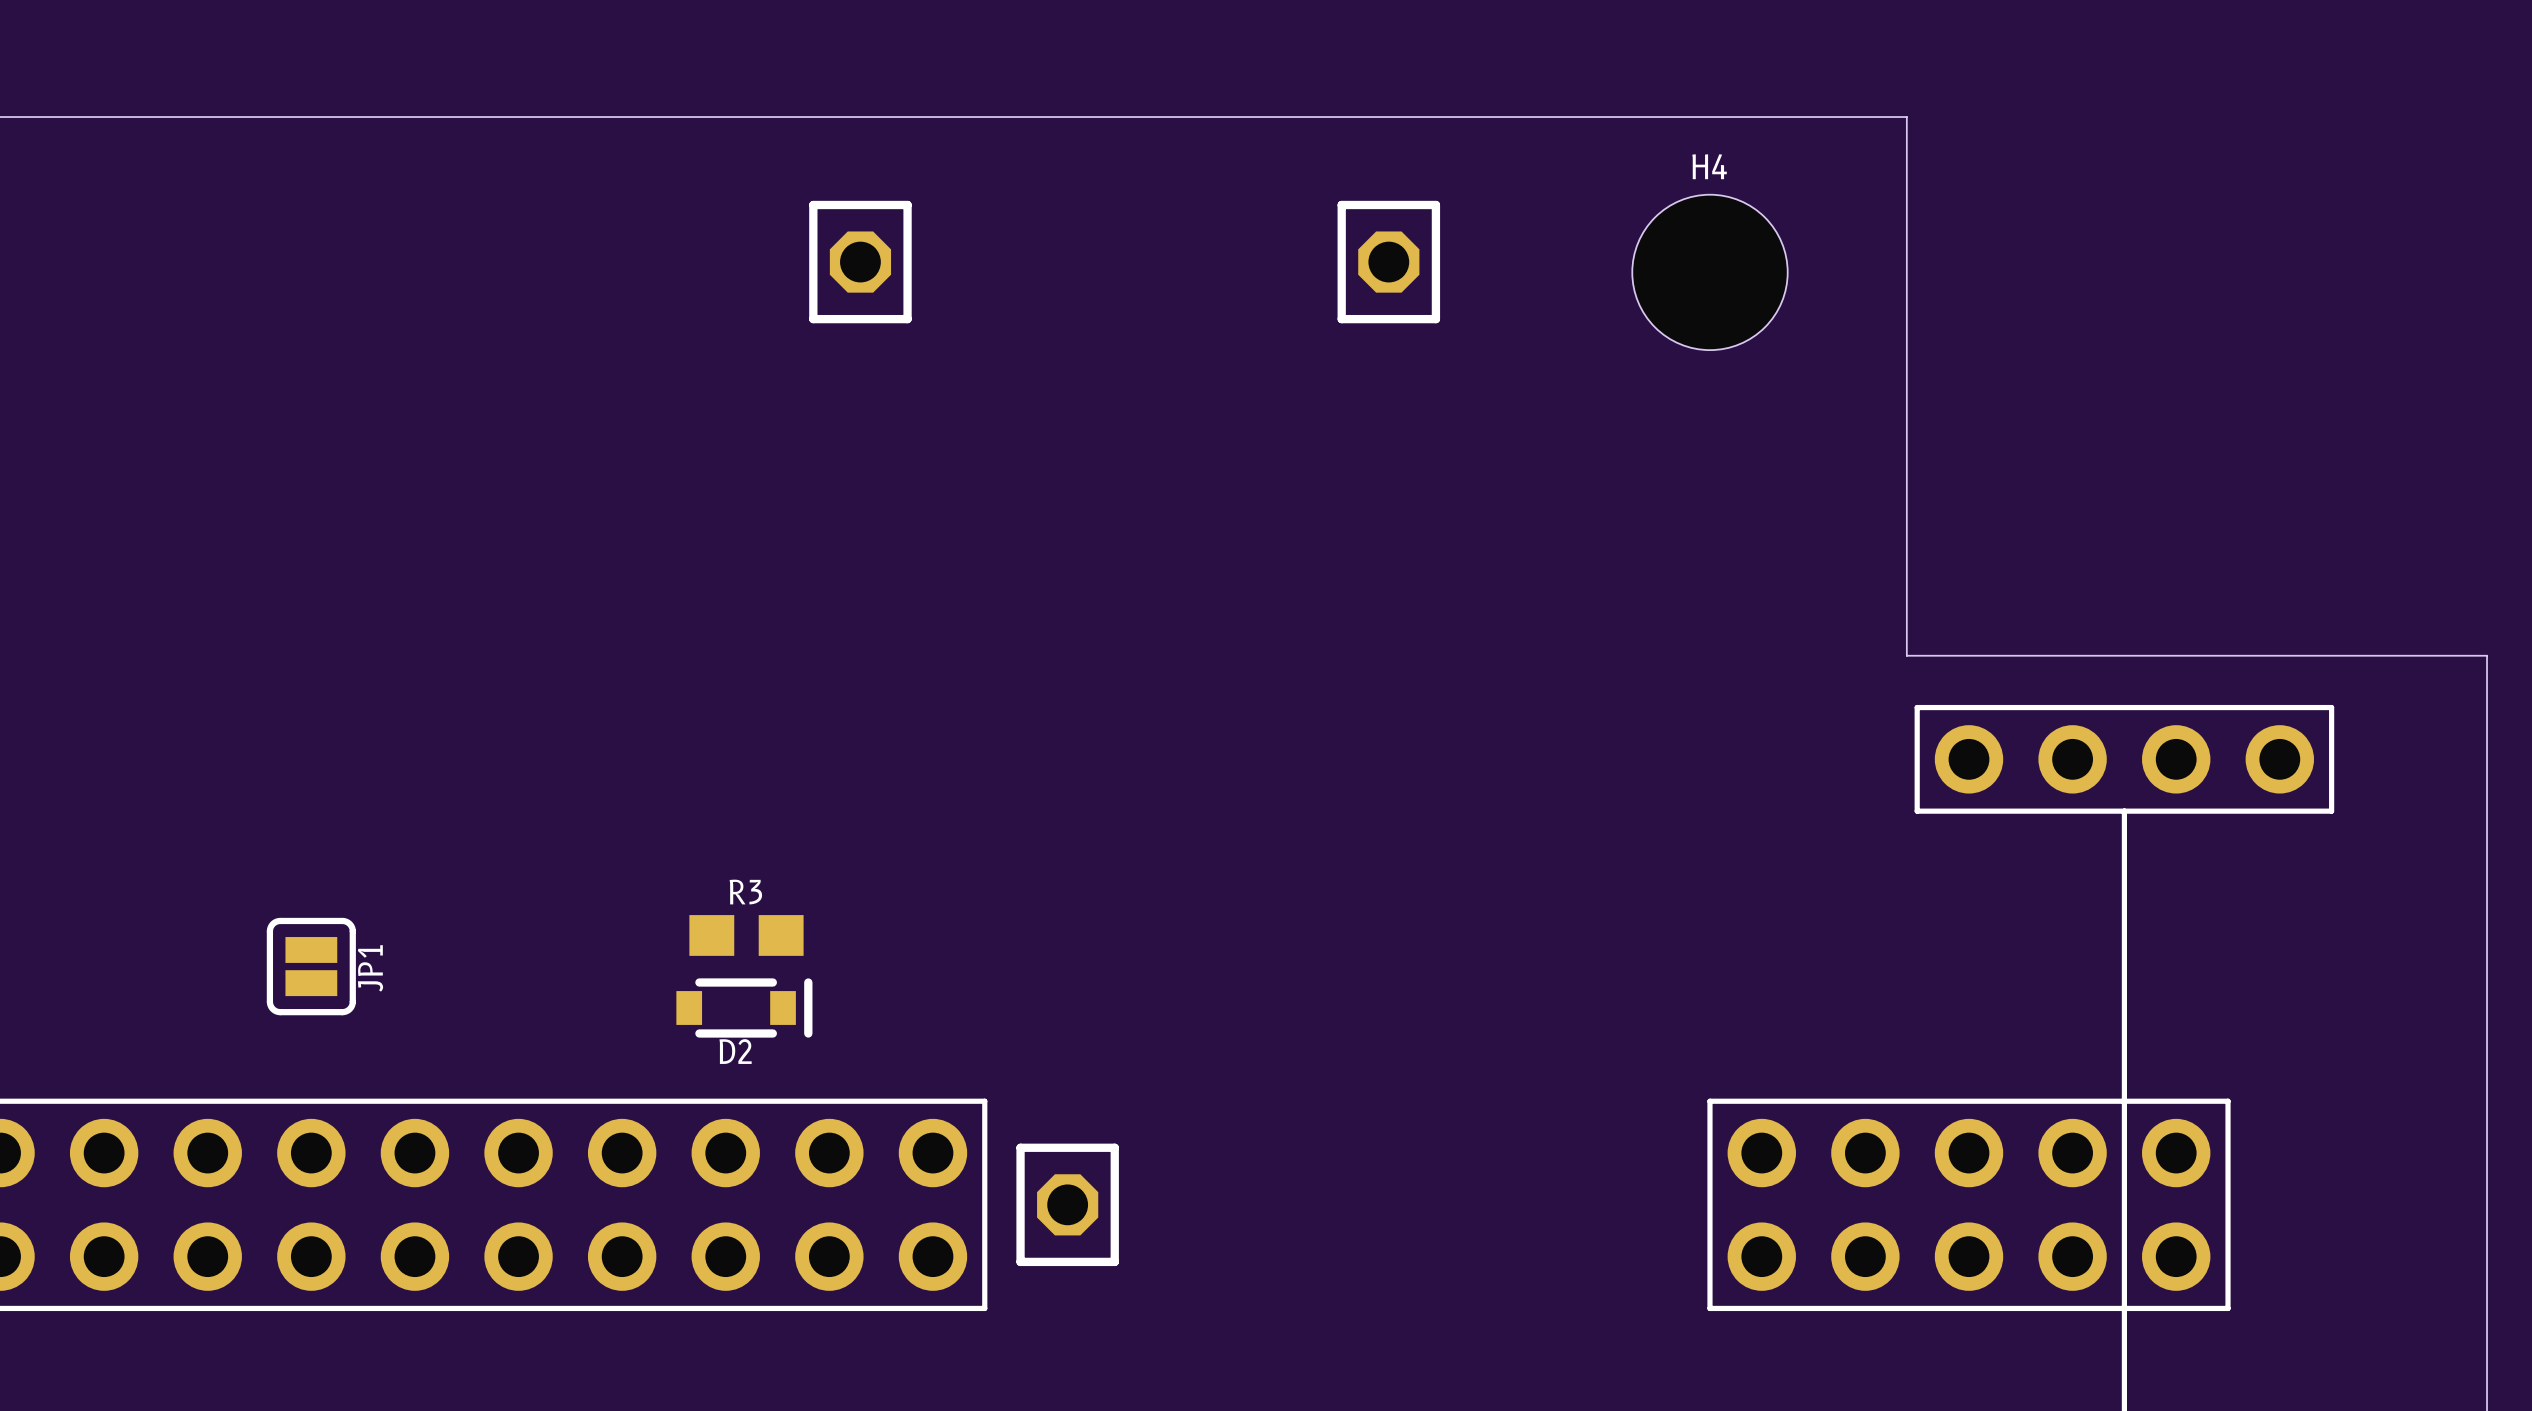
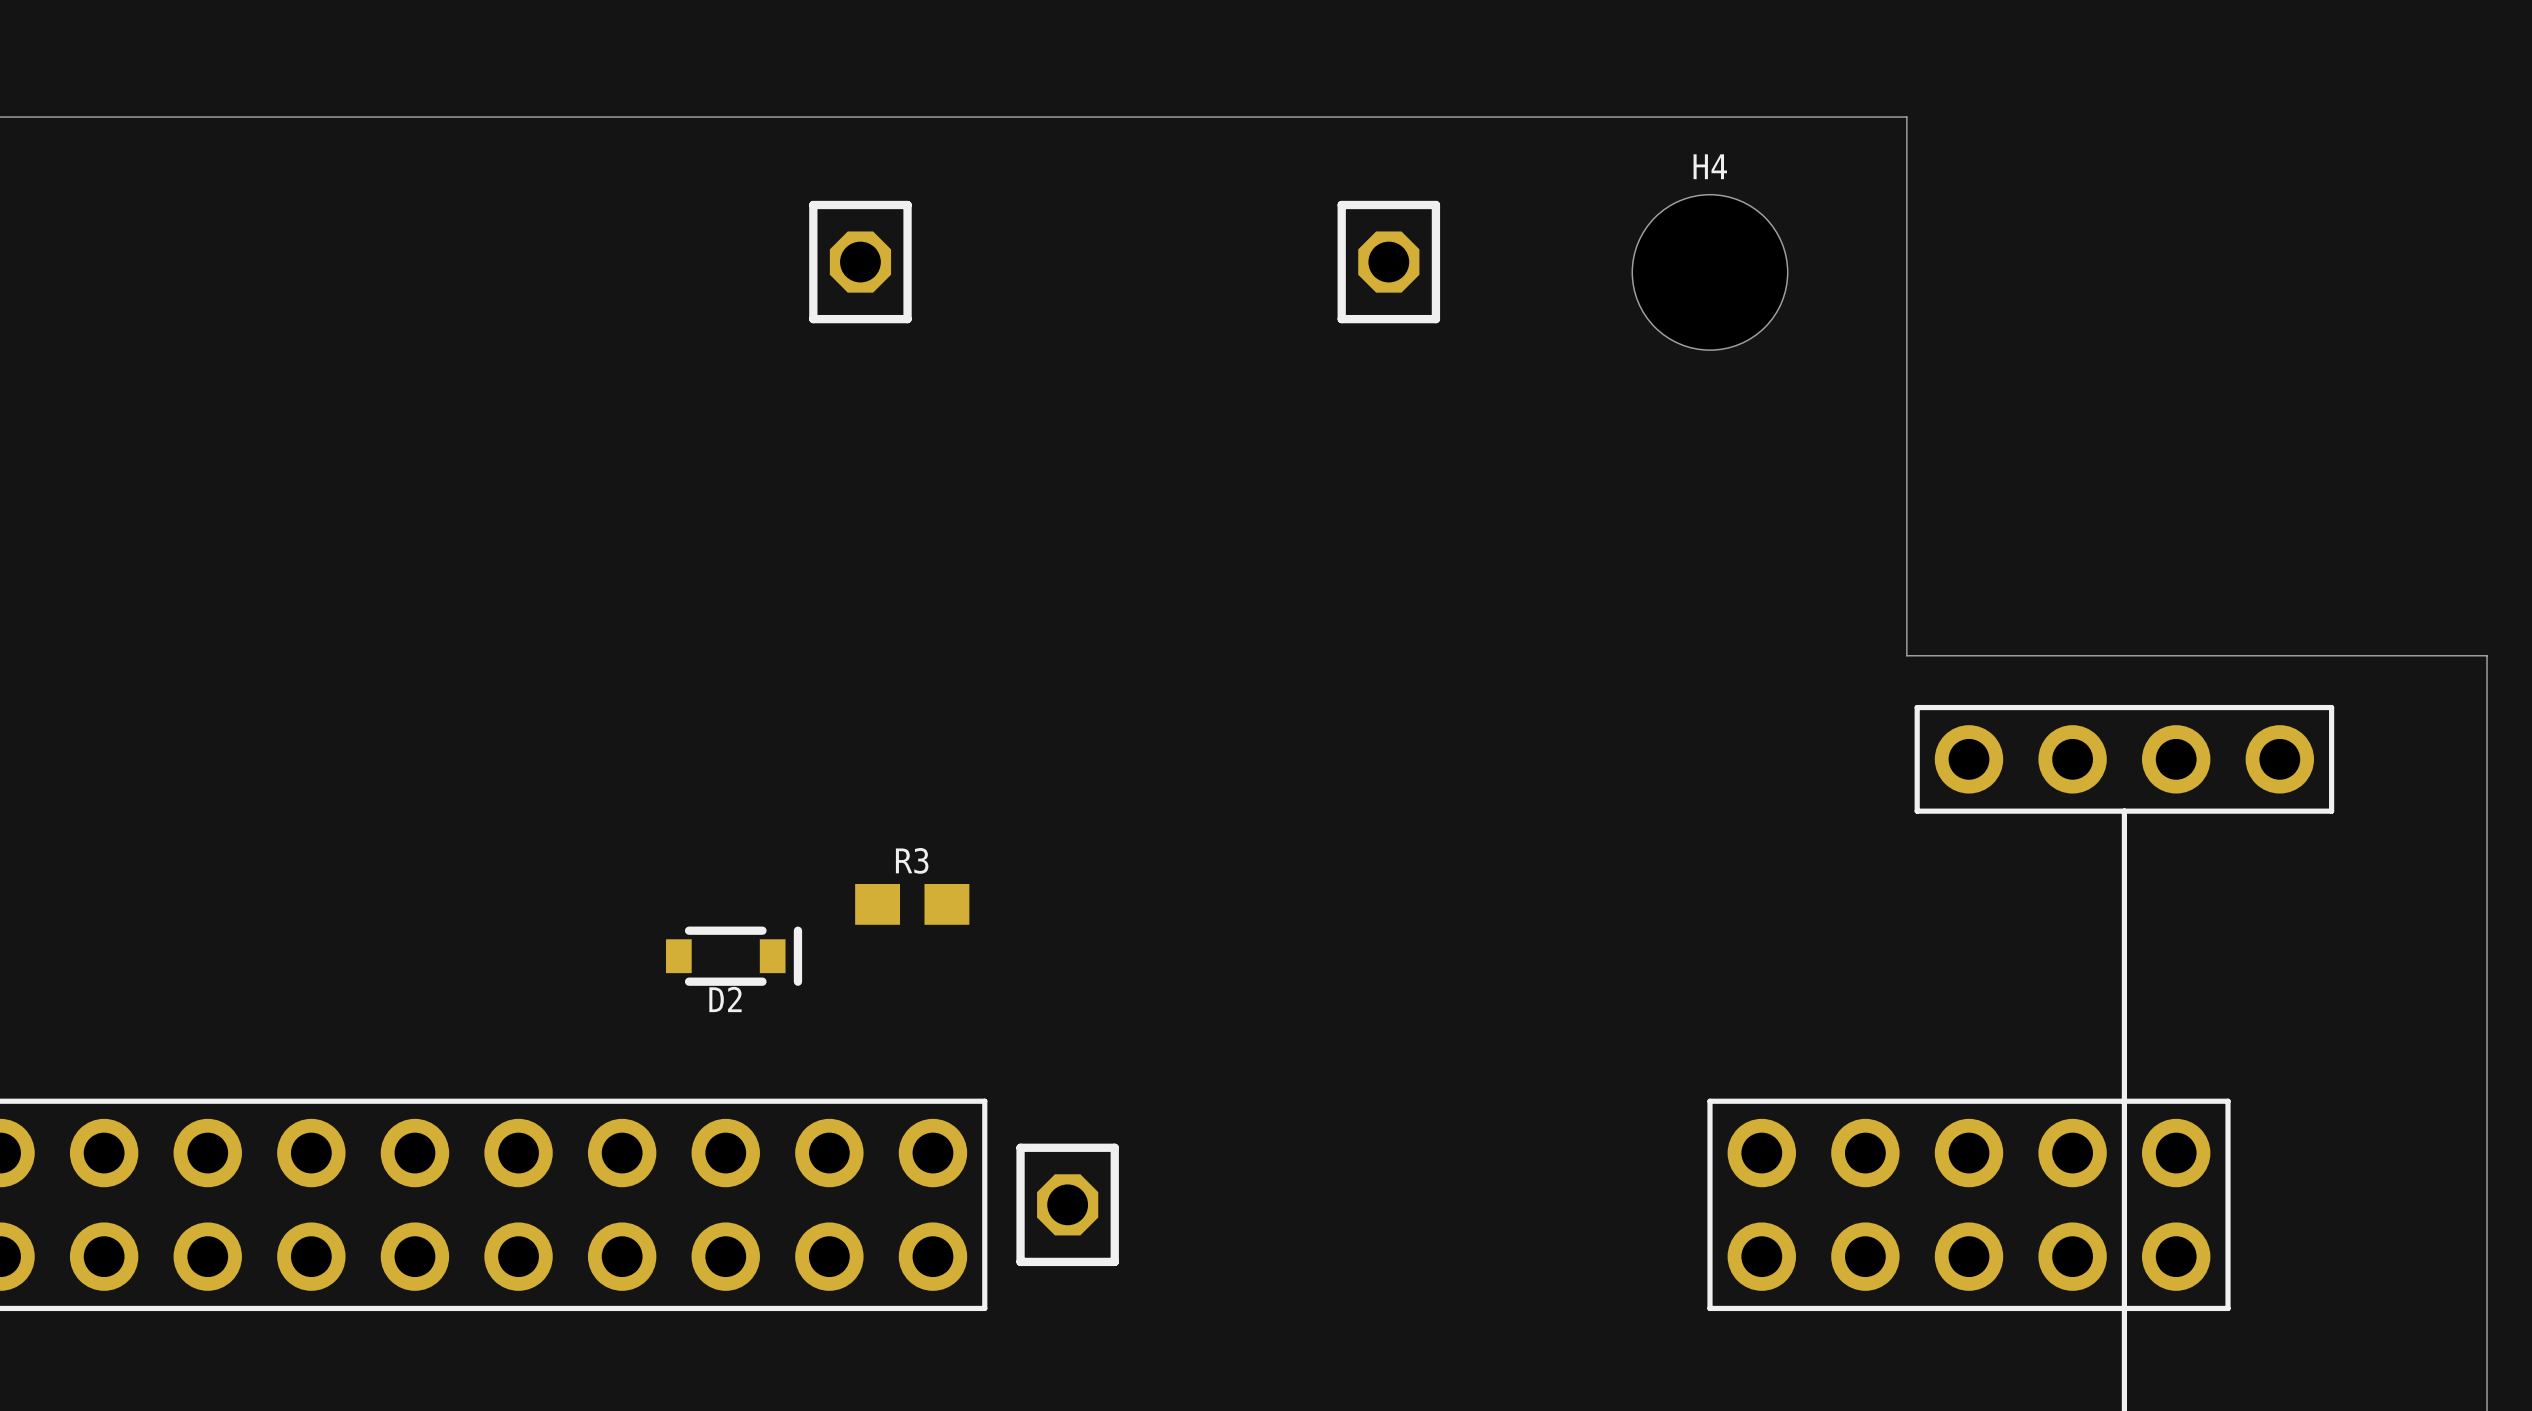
R3 position: (746, 935) -> (912, 904)
JP1: (311, 966) -> none
D2 position: (744, 1008) -> (734, 956)

